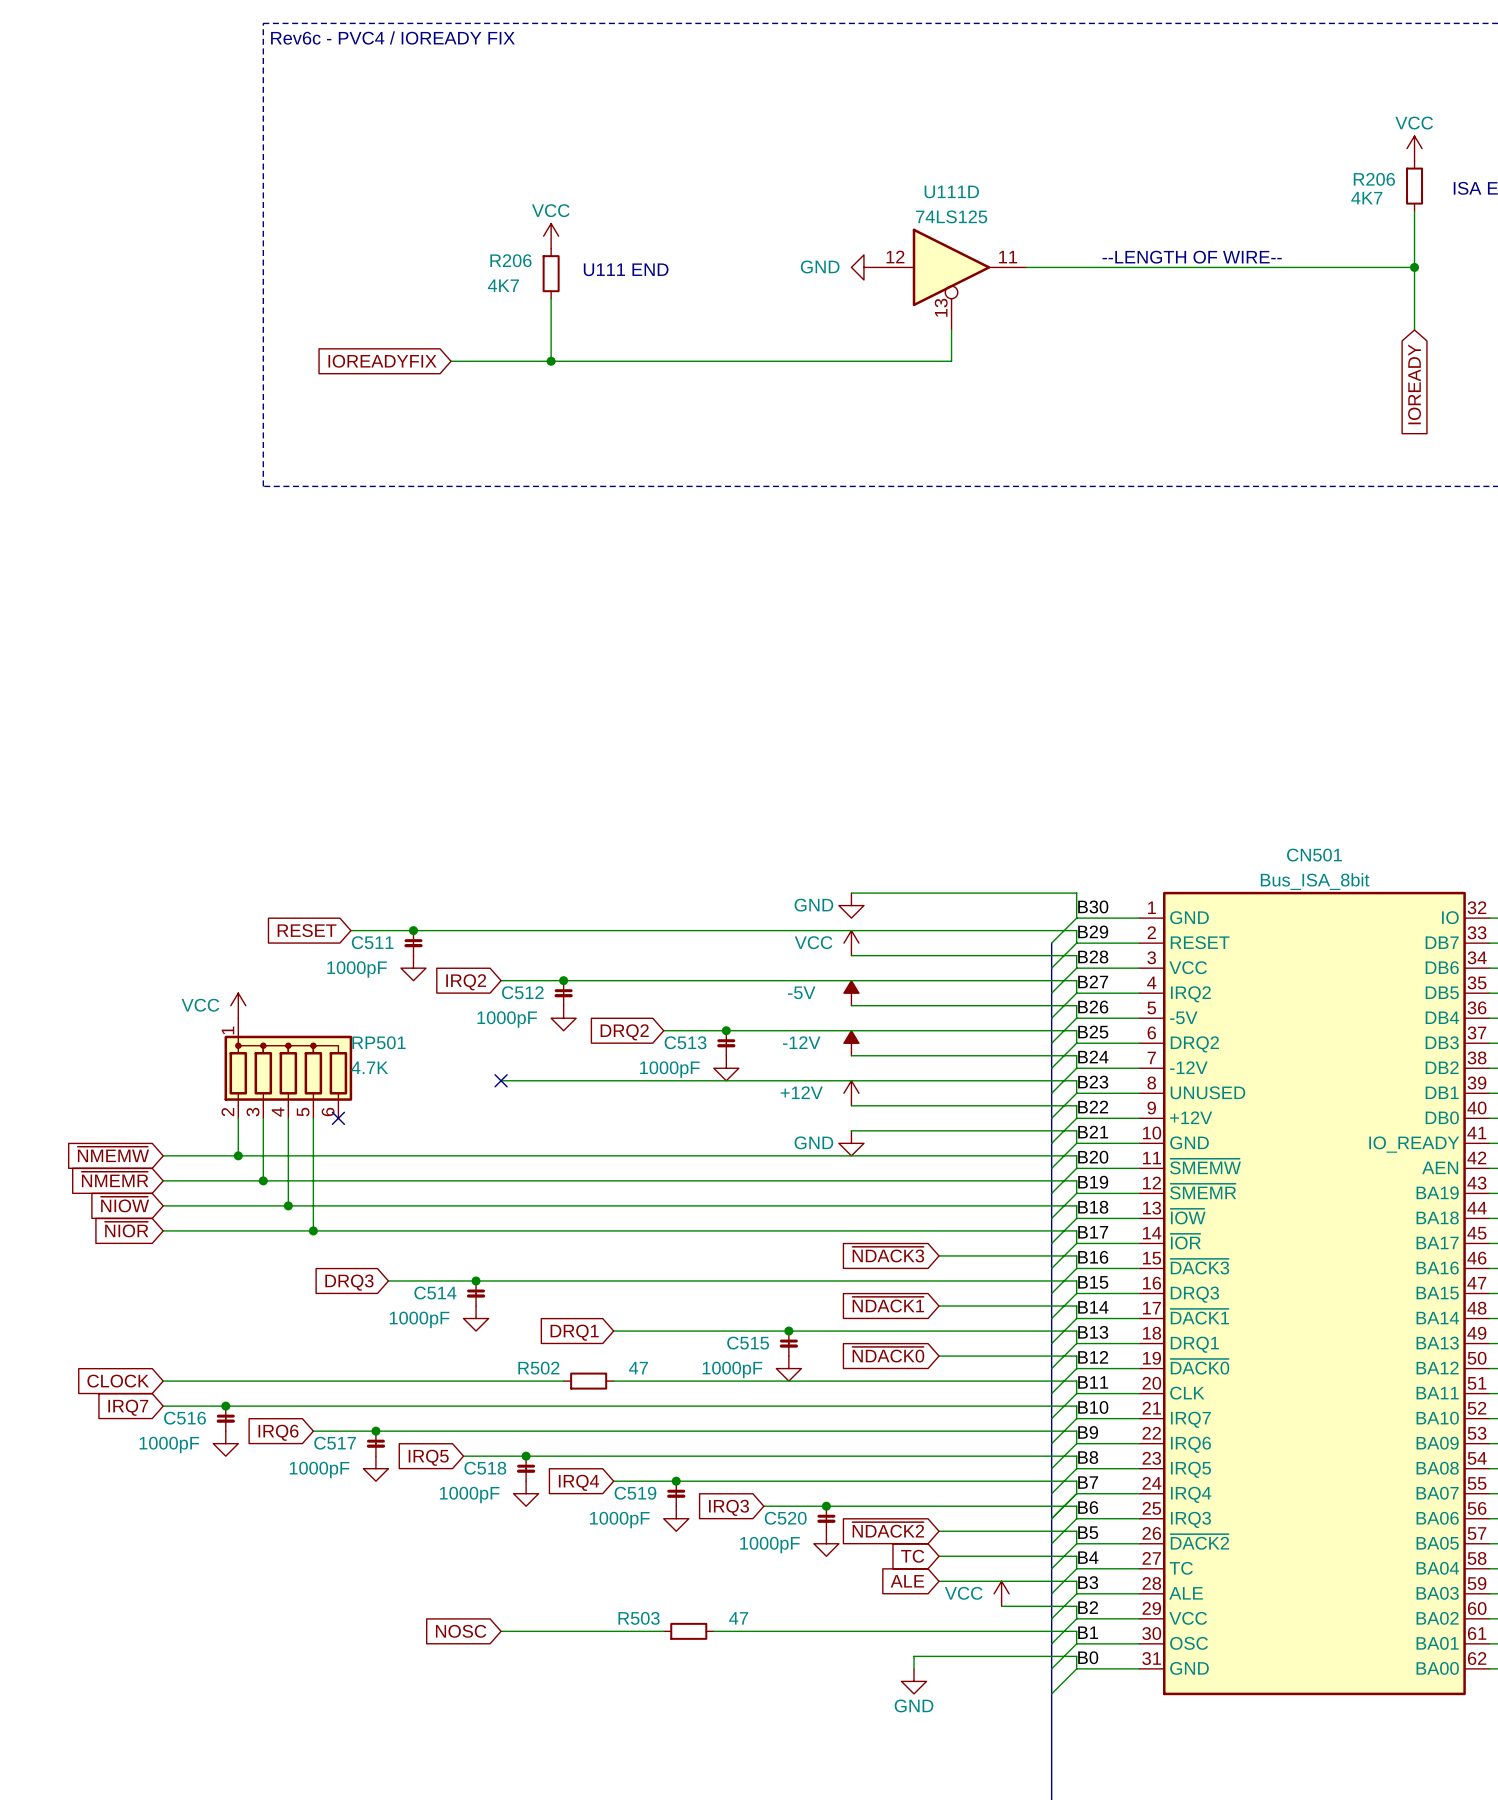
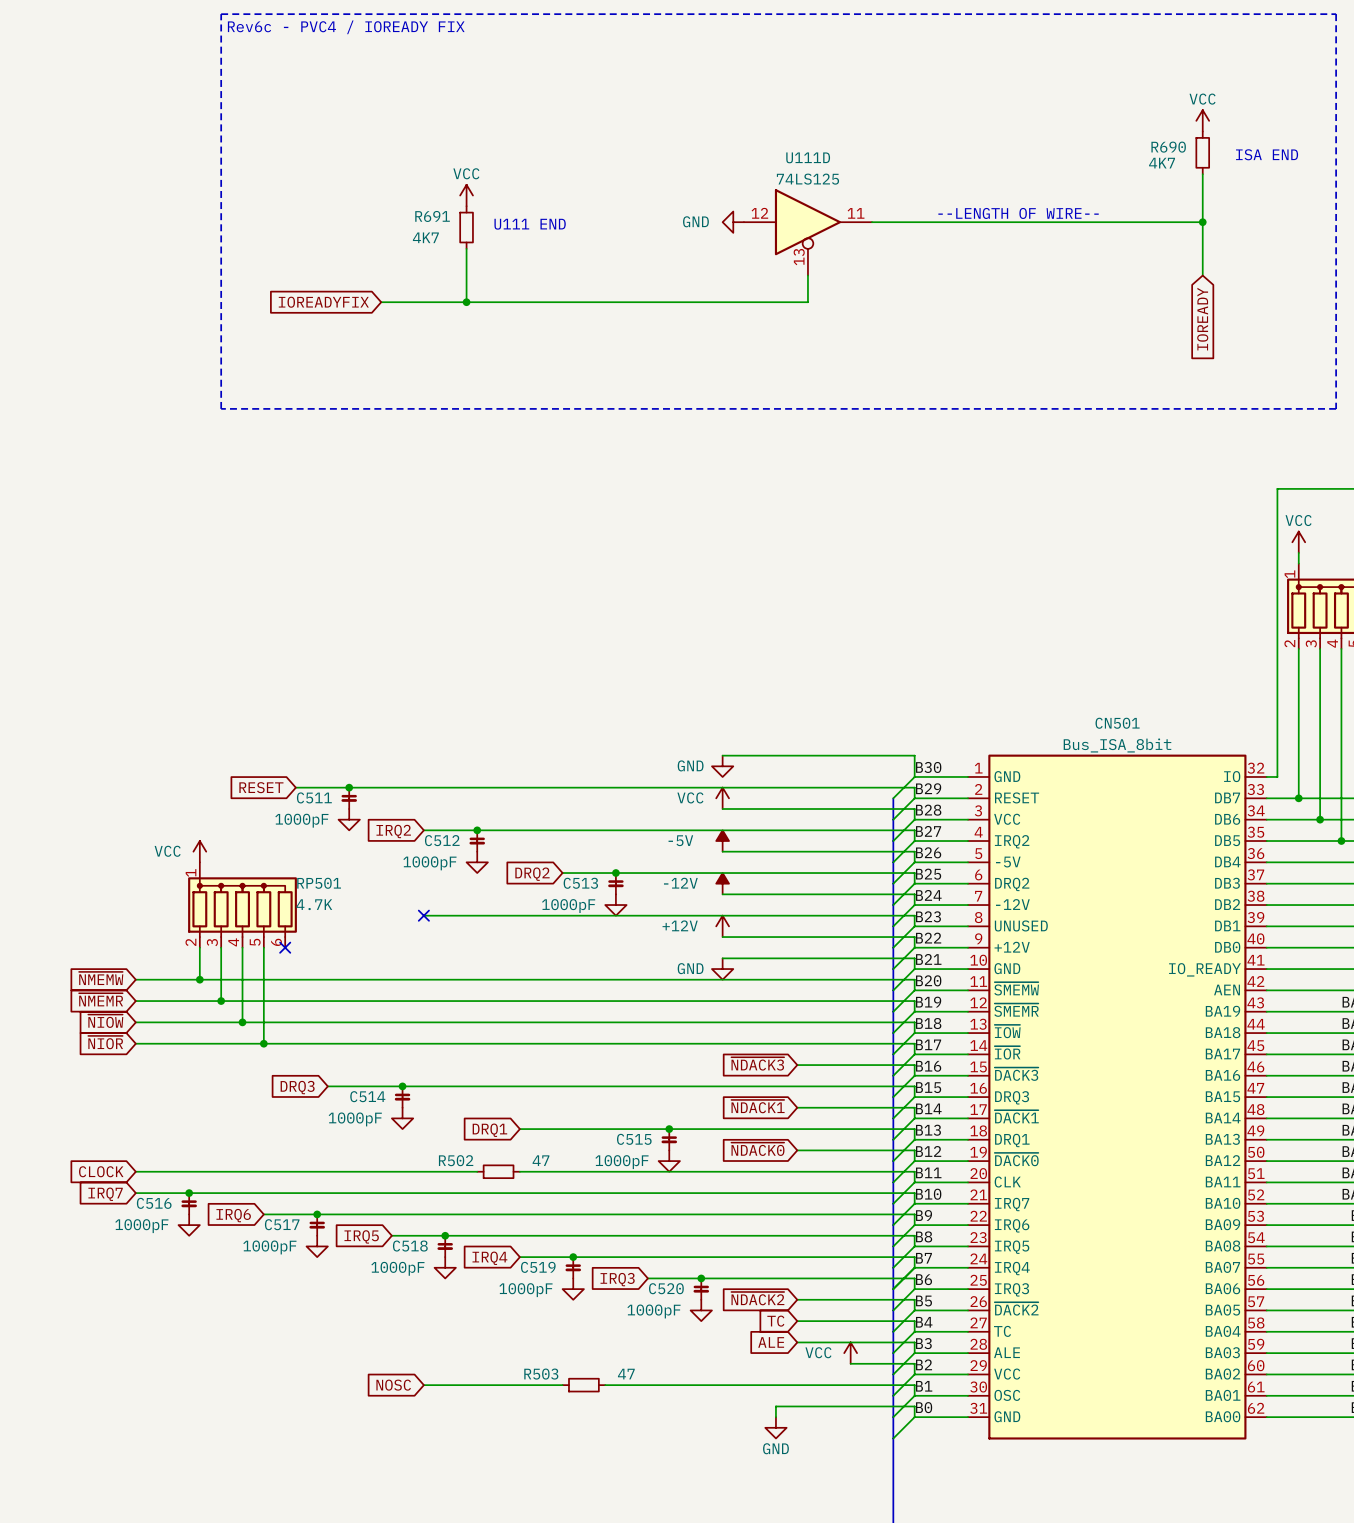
R206 name: R206 (1374, 179) -> R690 (1168, 147)
R206 name: R206 (510, 260) -> R691 (432, 216)

